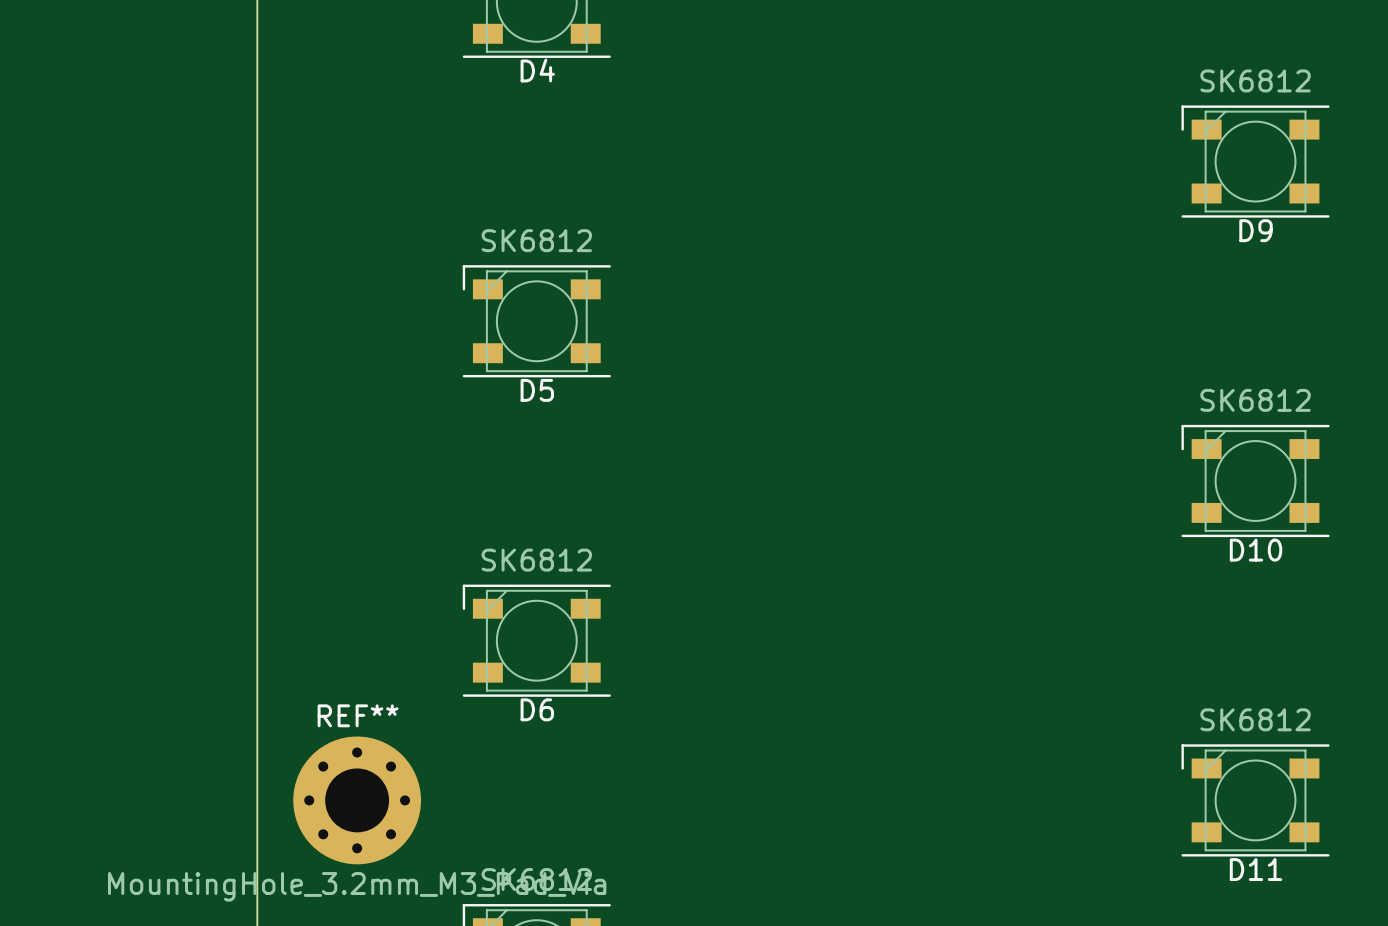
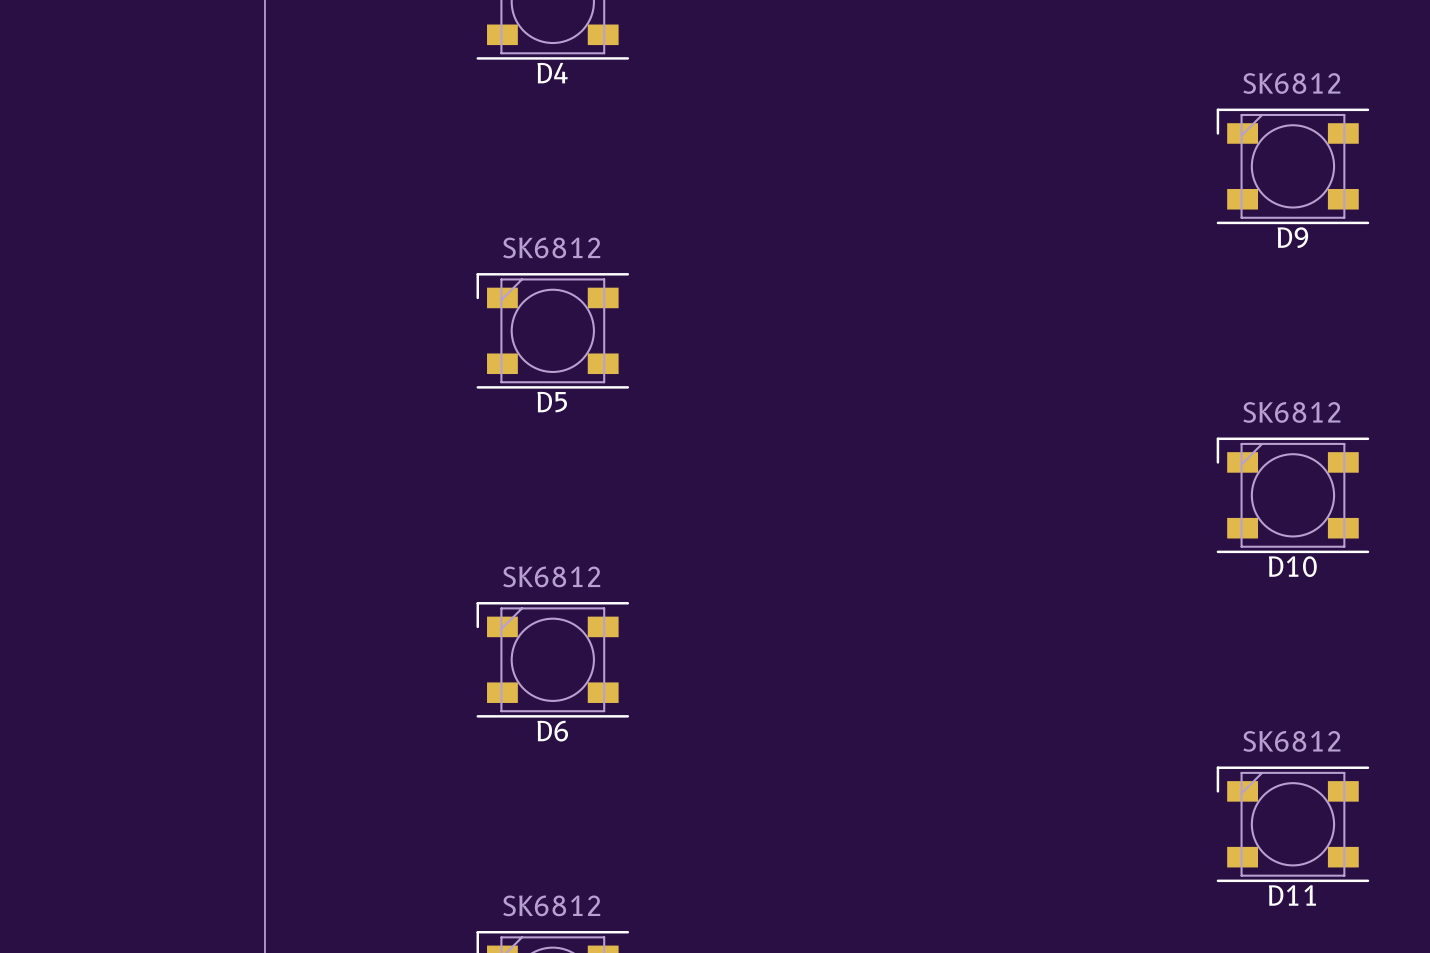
REF**: MountingHole_3.2mm_M3_Pad_Via (357, 800) -> none

